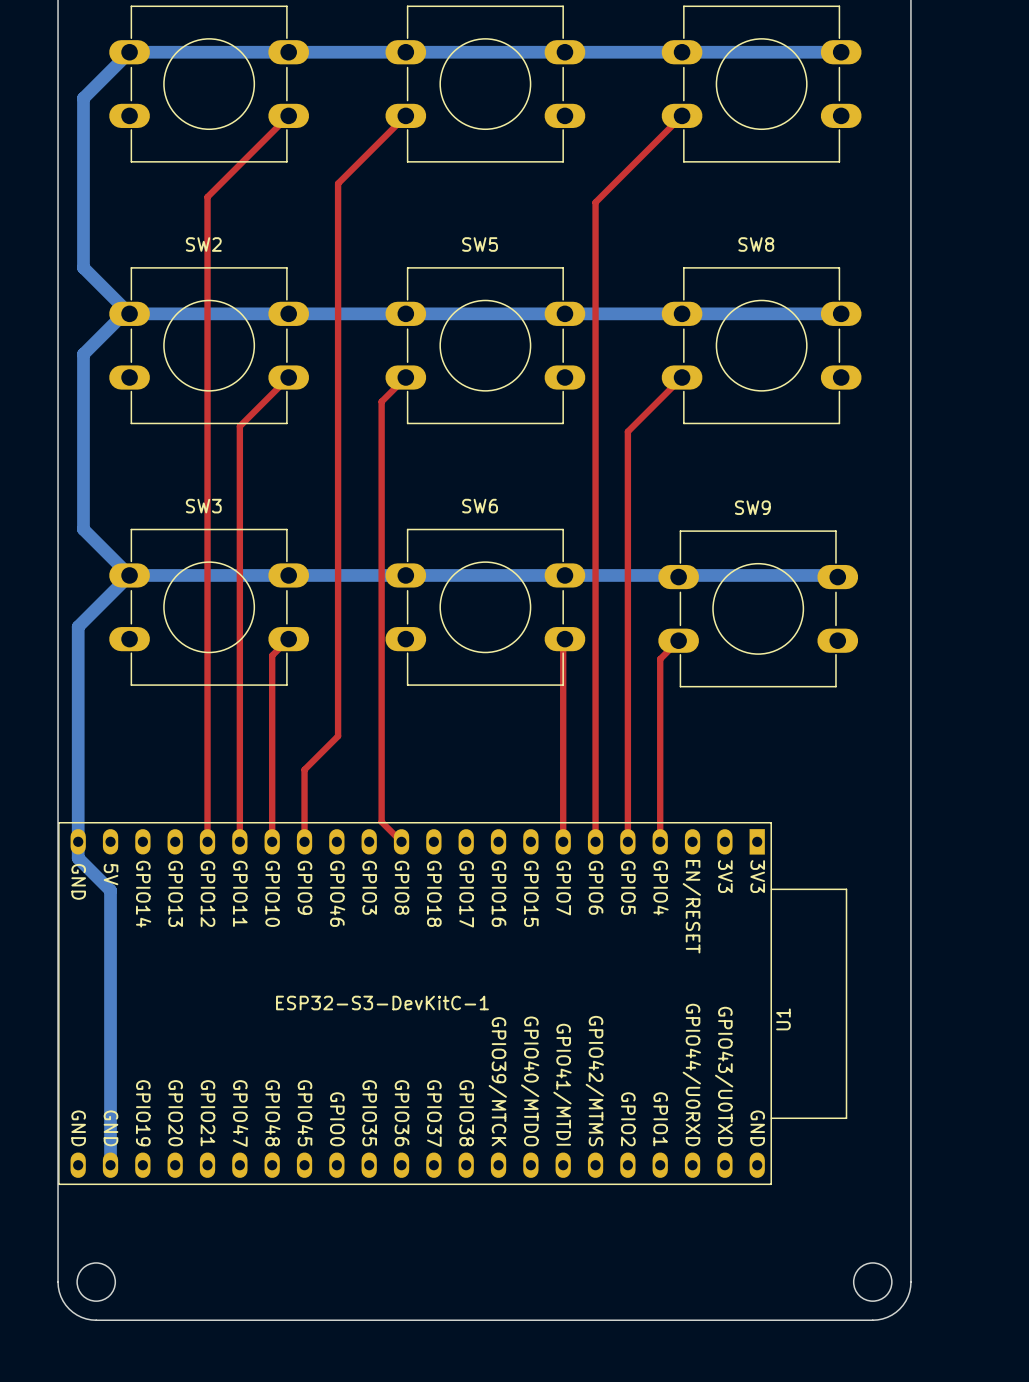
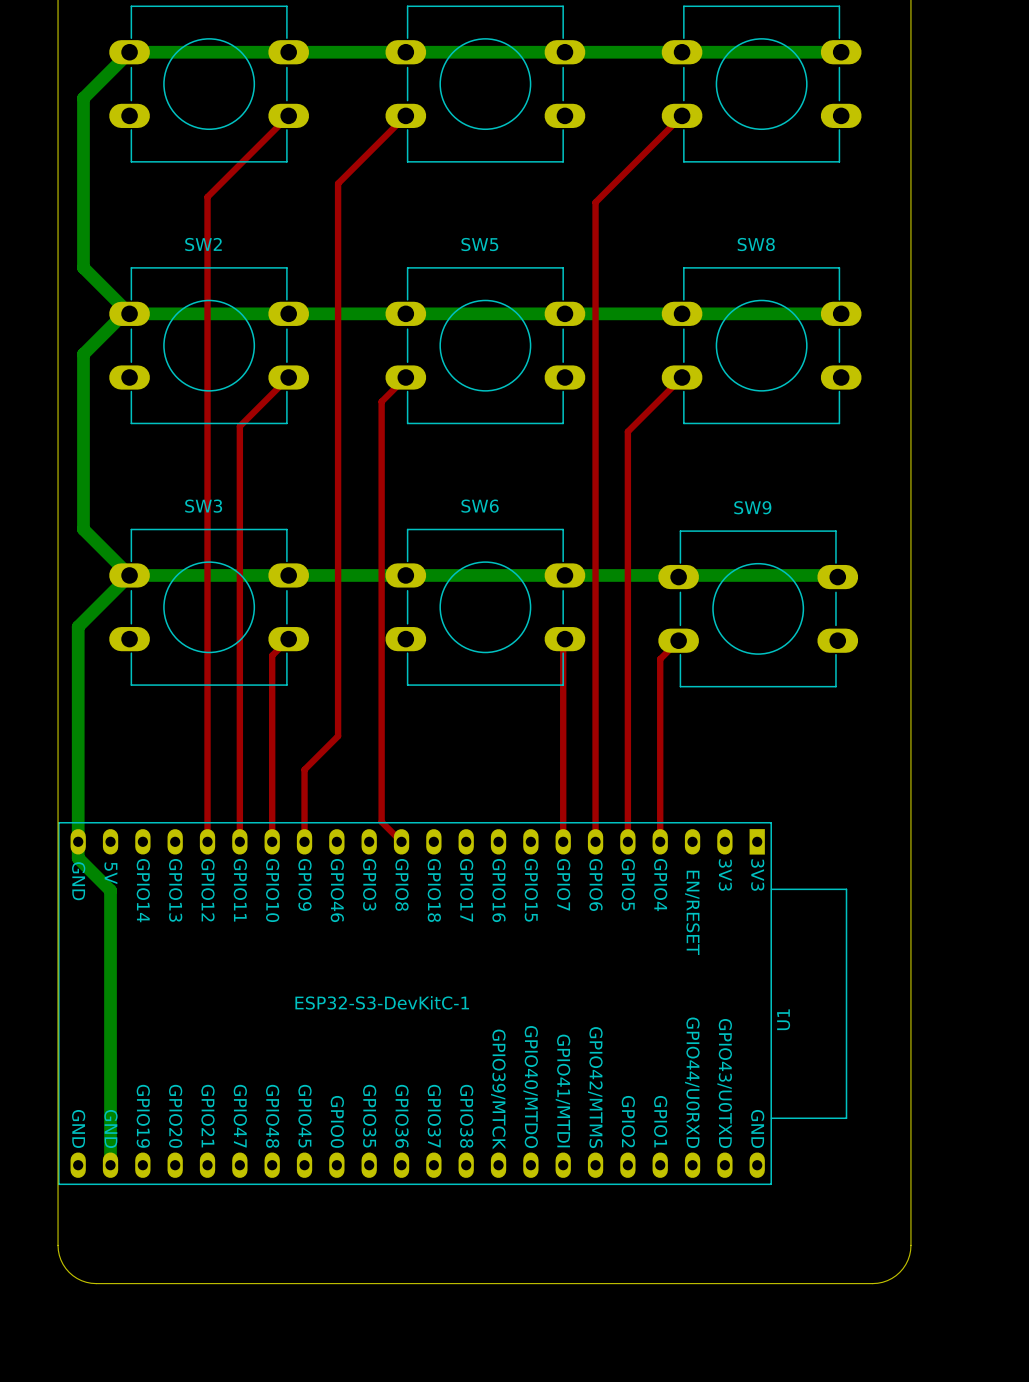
board edge: (58, 1245) (58, 1287) (63, 1301) (77, 1315) (96, 1320) (877, 1319) (896, 1312) (908, 1296) (910, 1282) (910, 1245) -> (58, 1245) (60, 1260) (69, 1272) (81, 1280) (96, 1283) (872, 1283) (887, 1280) (899, 1272) (908, 1260) (910, 1245)
round board edge: [76, 1262, 116, 1302] -> none
round board edge: [853, 1262, 893, 1302] -> none

